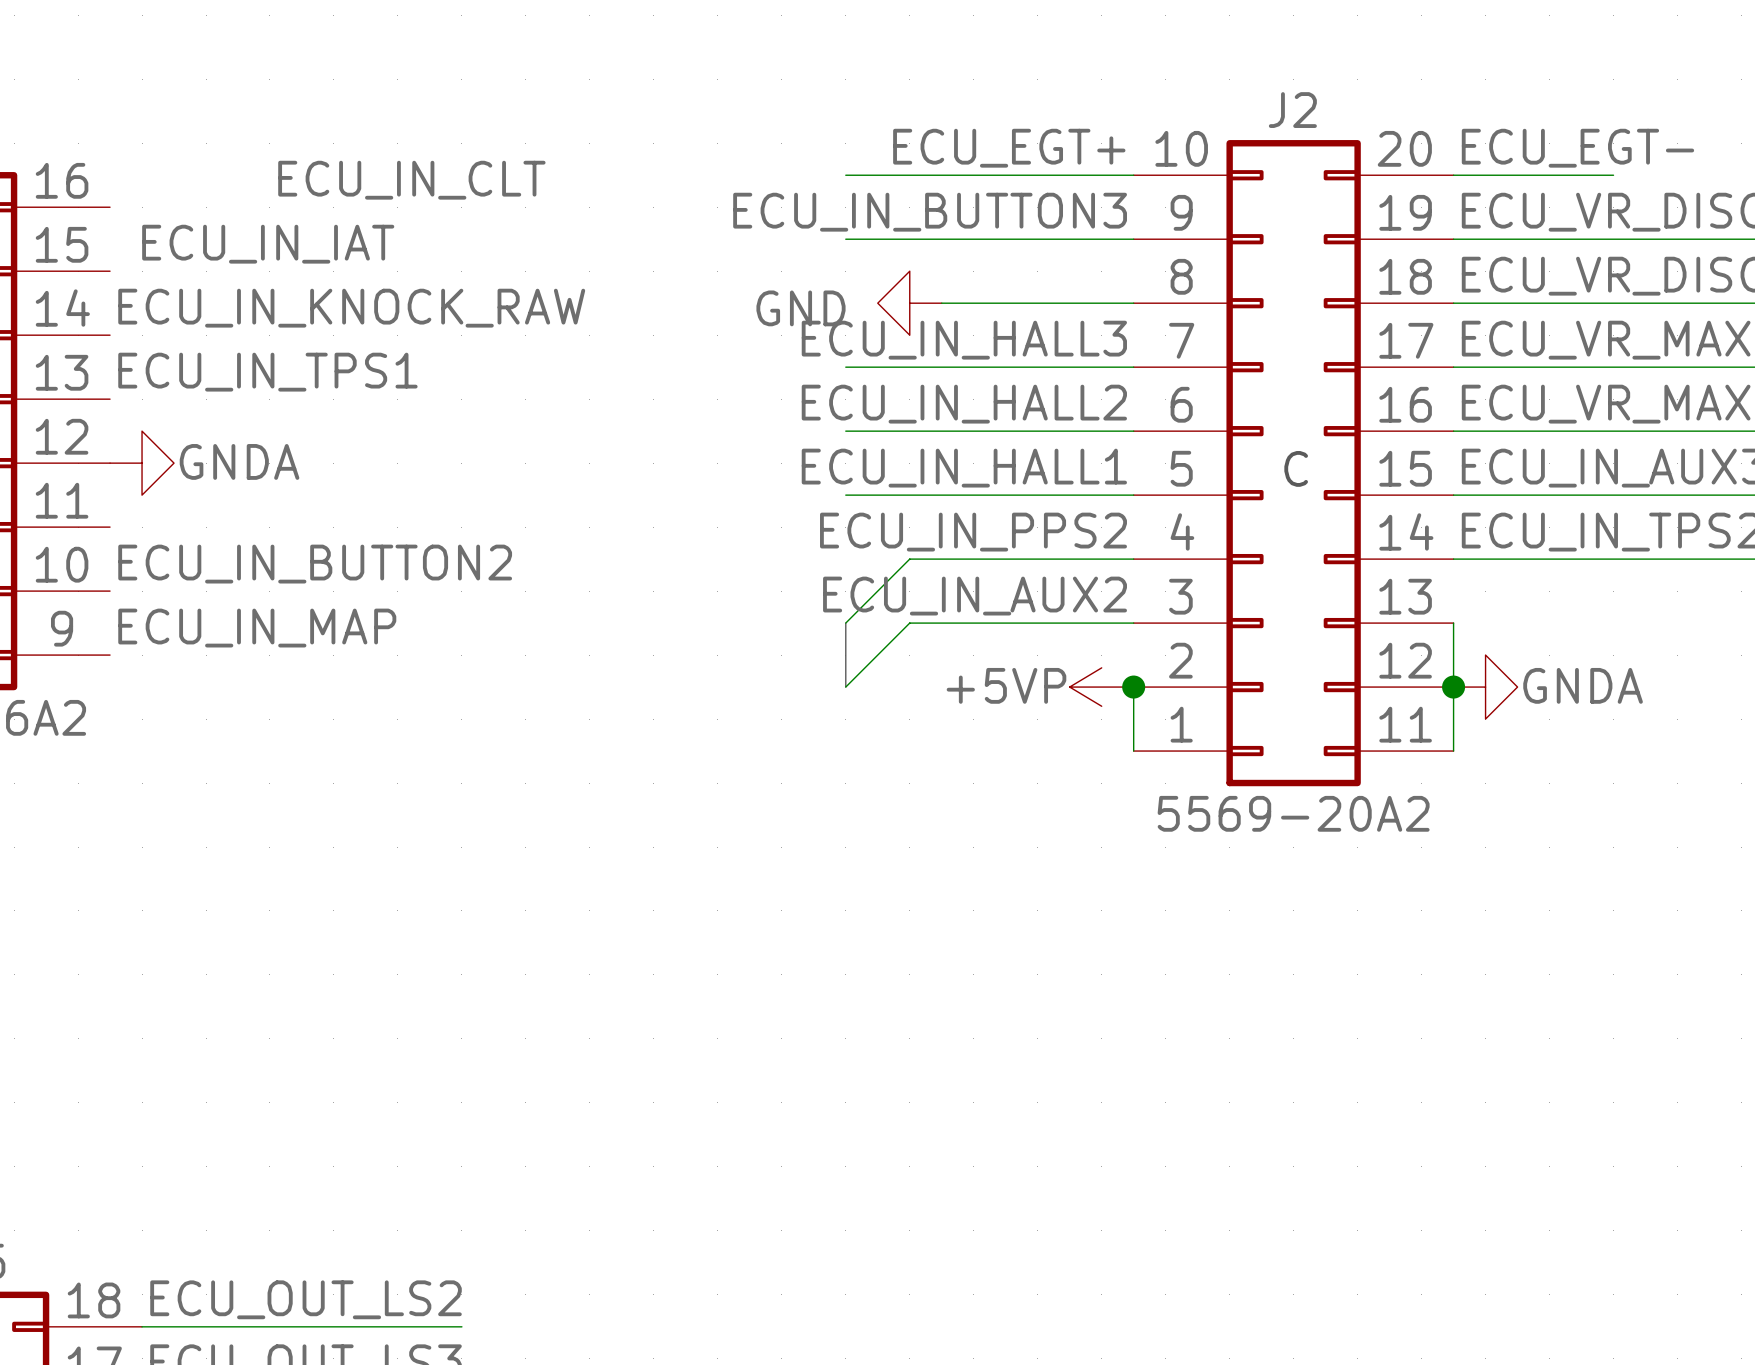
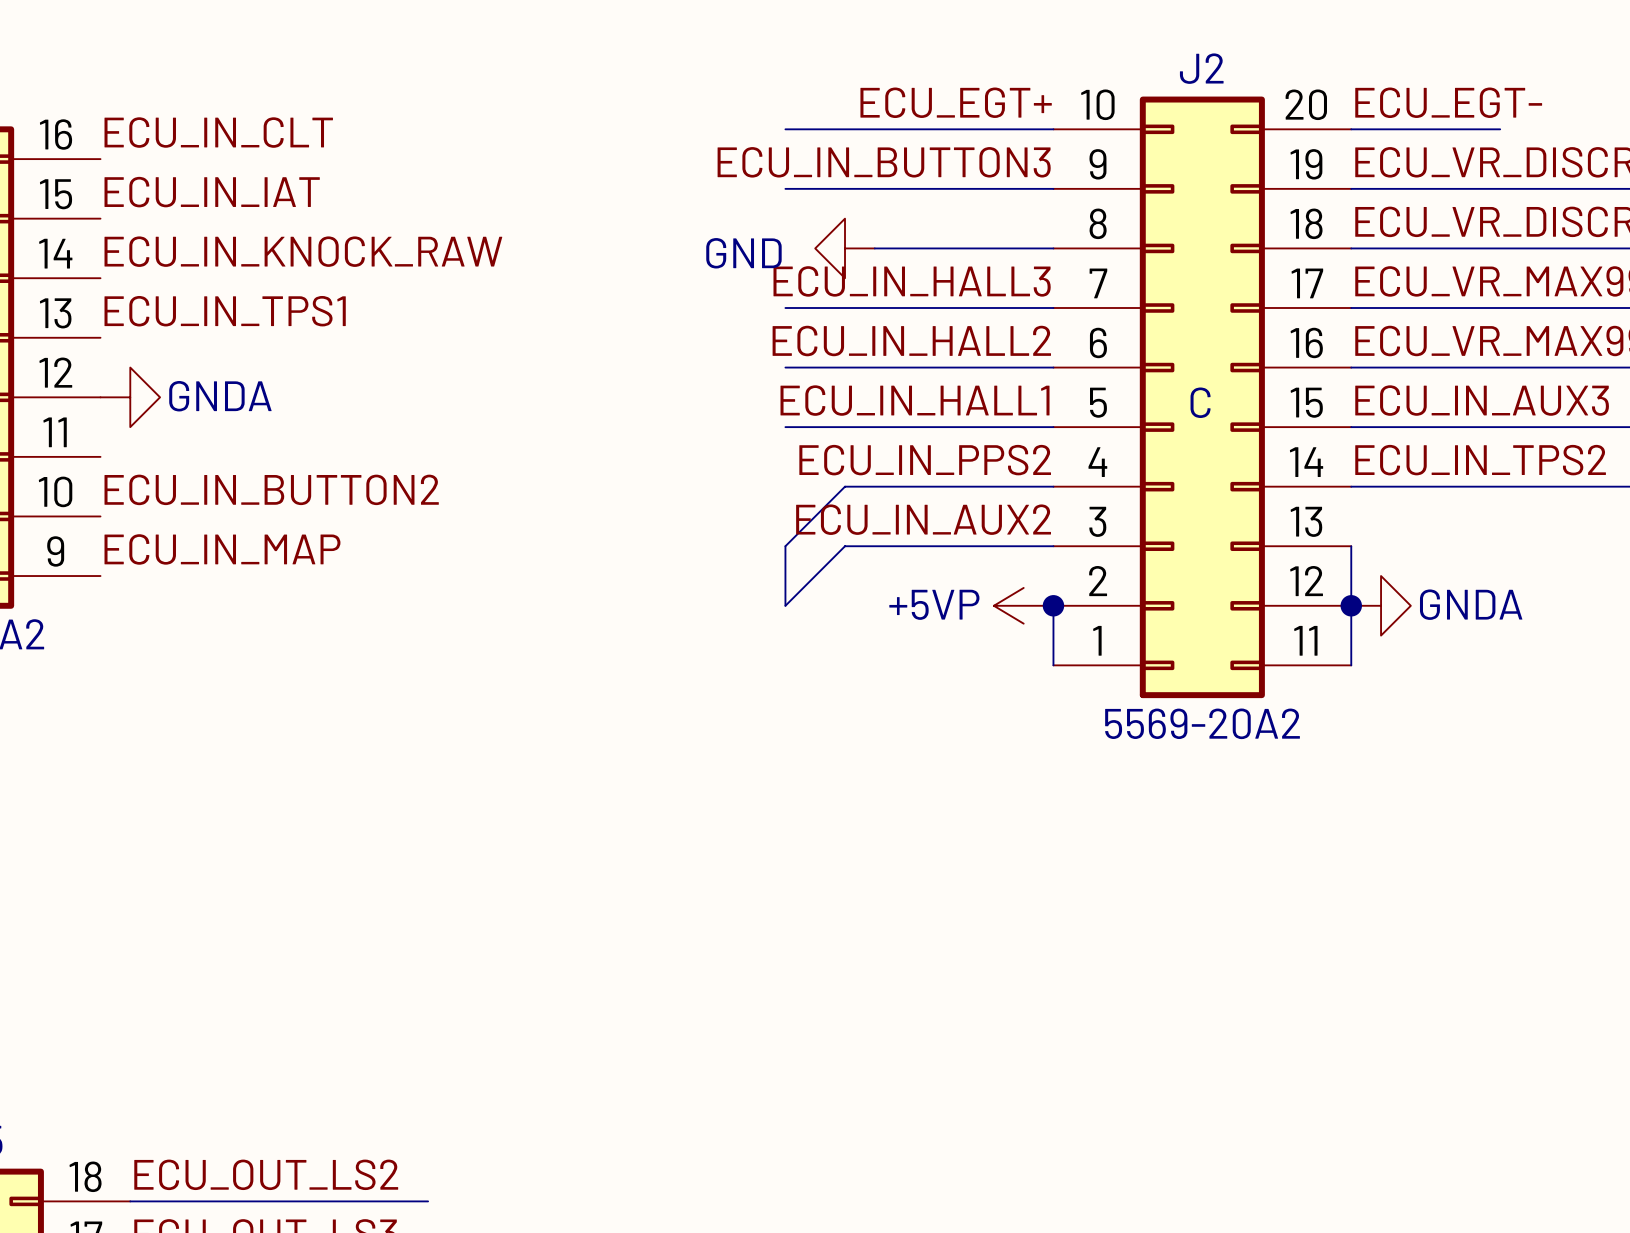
label position: ECU_IN_CLT (411, 180) -> ECU_IN_CLT (218, 132)
label position: ECU_IN_IAT (268, 244) -> ECU_IN_IAT (212, 192)

